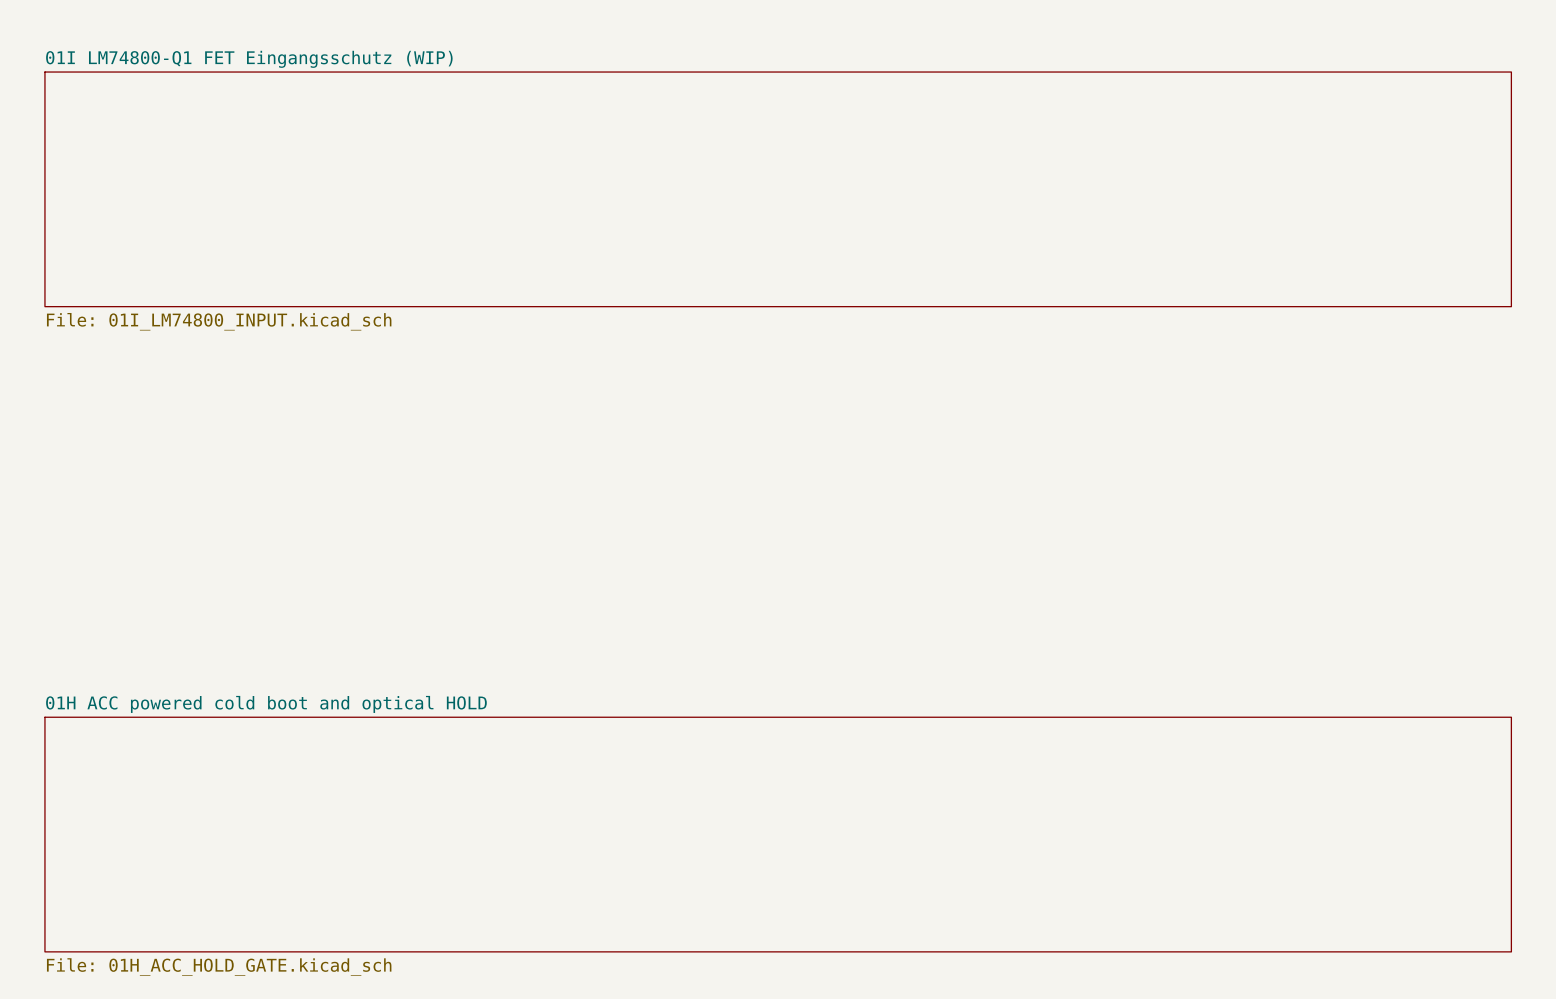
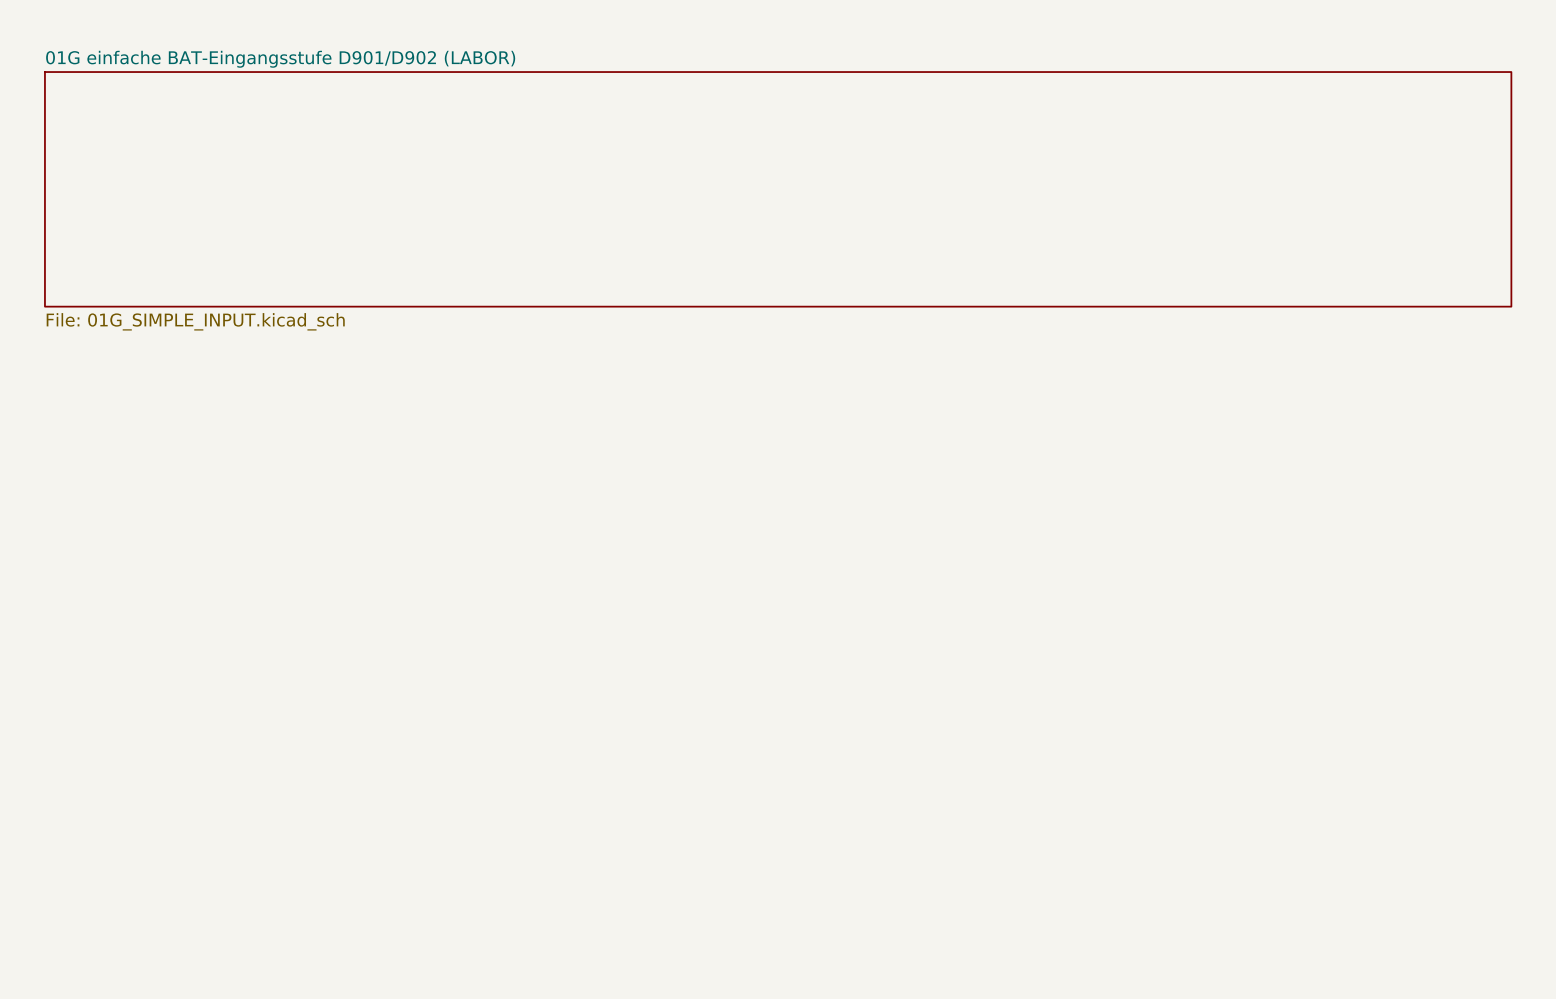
sheet 01I LM74800-Q1 FET Eingangsschutz (WIP) name: 01I LM74800-Q1 FET Eingangsschutz (WIP) (249, 59) -> 01G einfache BAT-Eingangsstufe D901/D902 (LABOR) (280, 59)
sheet 01I LM74800-Q1 FET Eingangsschutz (WIP) value: File: 01I_LM74800_INPUT.kicad_sch (219, 321) -> File: 01G_SIMPLE_INPUT.kicad_sch (195, 321)
sheet 01H ACC powered cold boot and optical HOLD: File: 01H_ACC_HOLD_GATE.kicad_sch (778, 834) -> none

